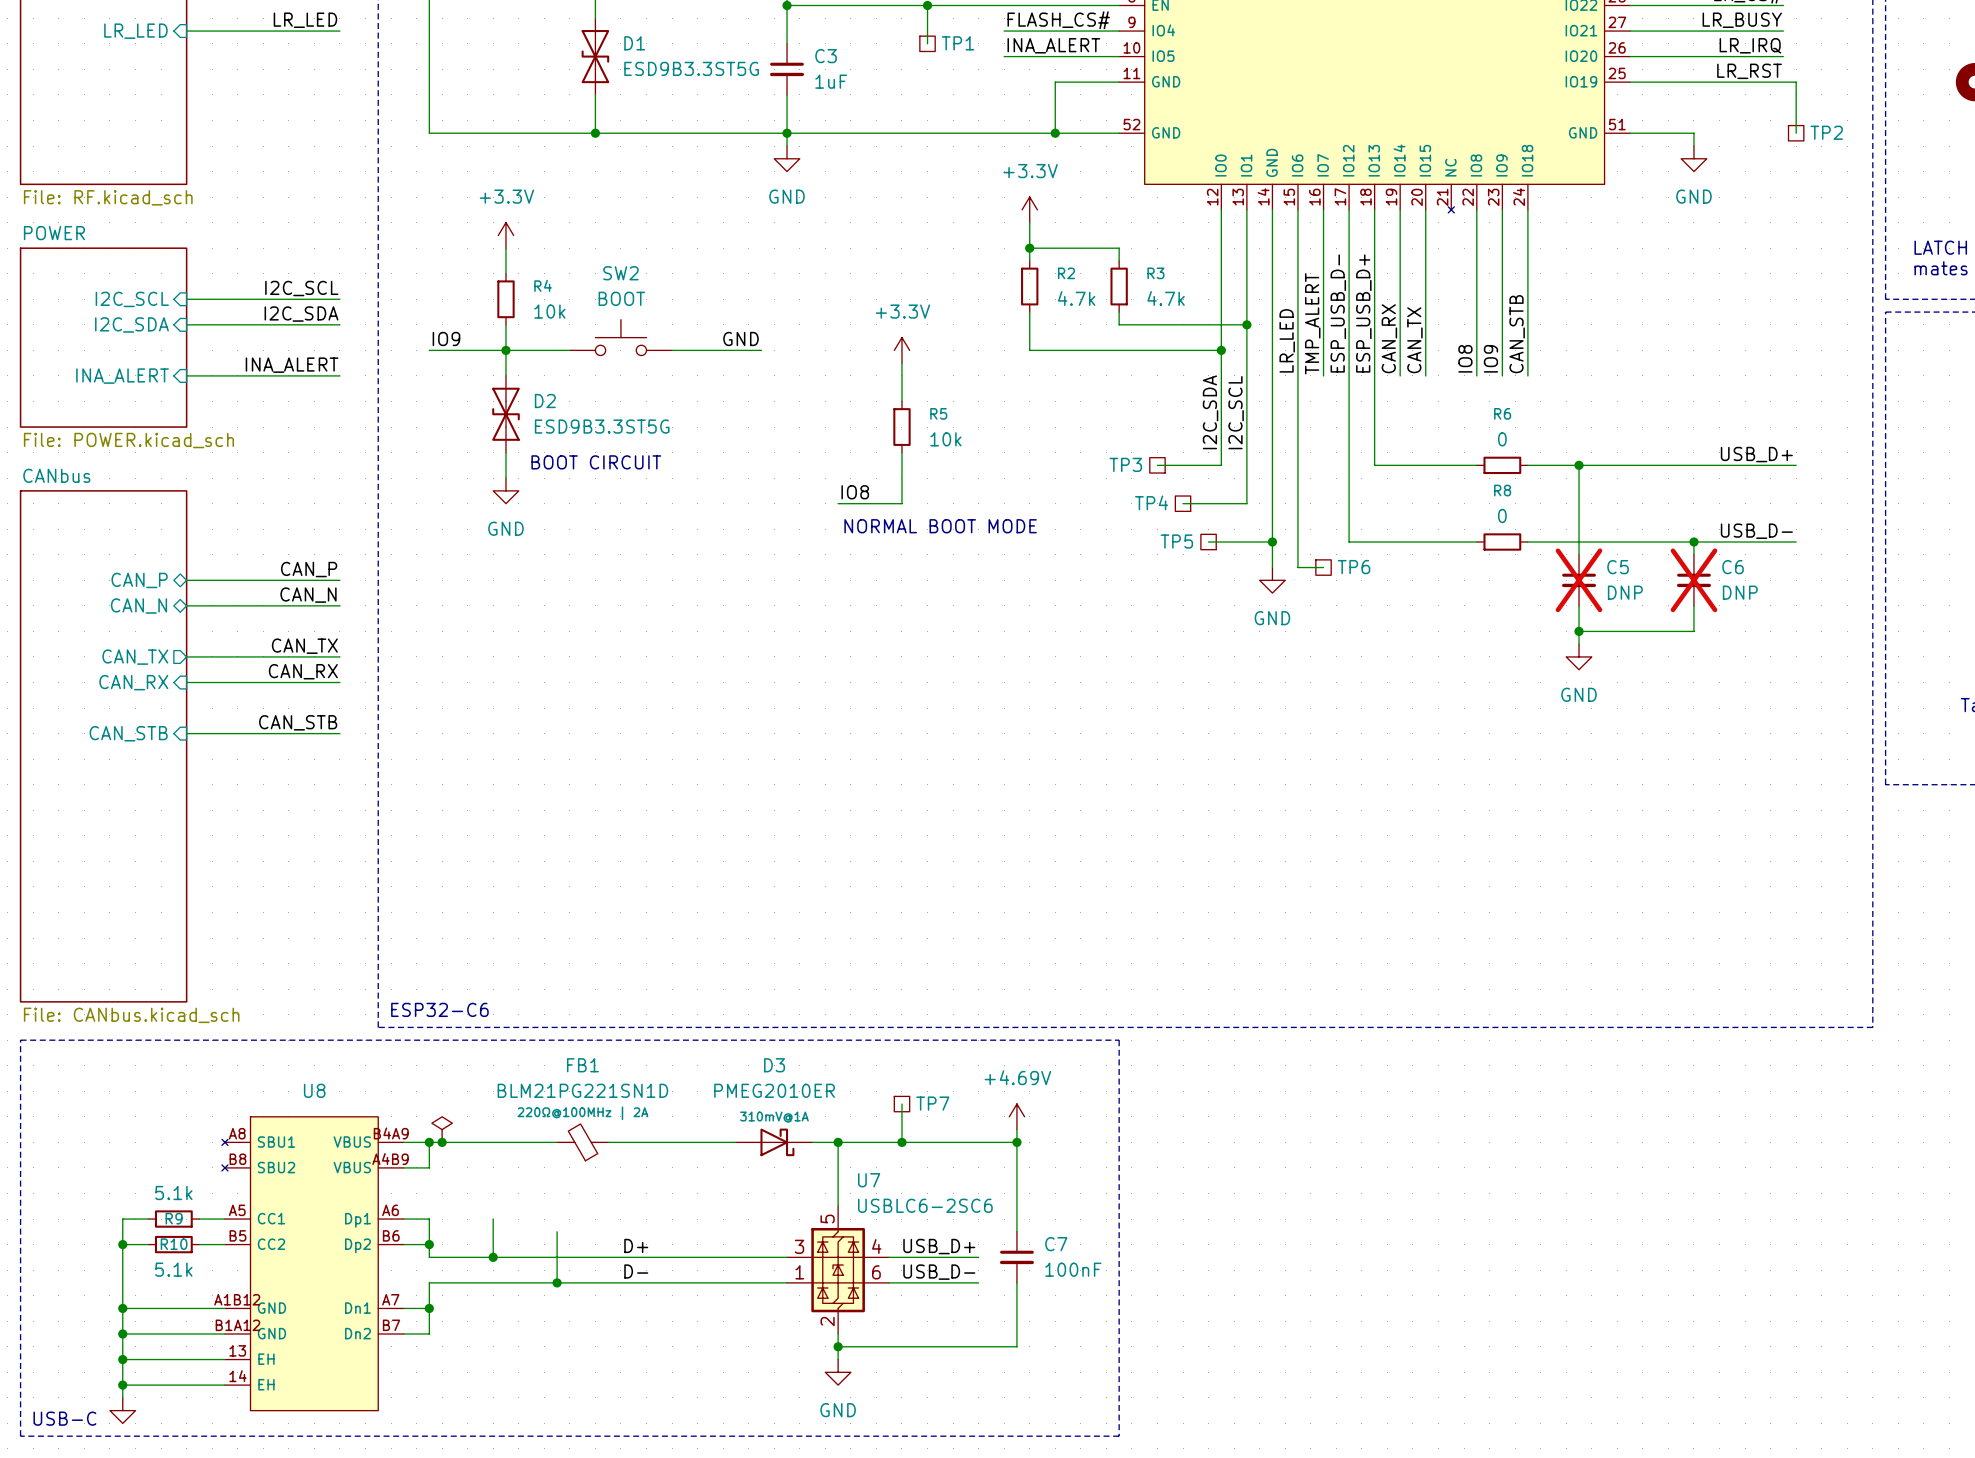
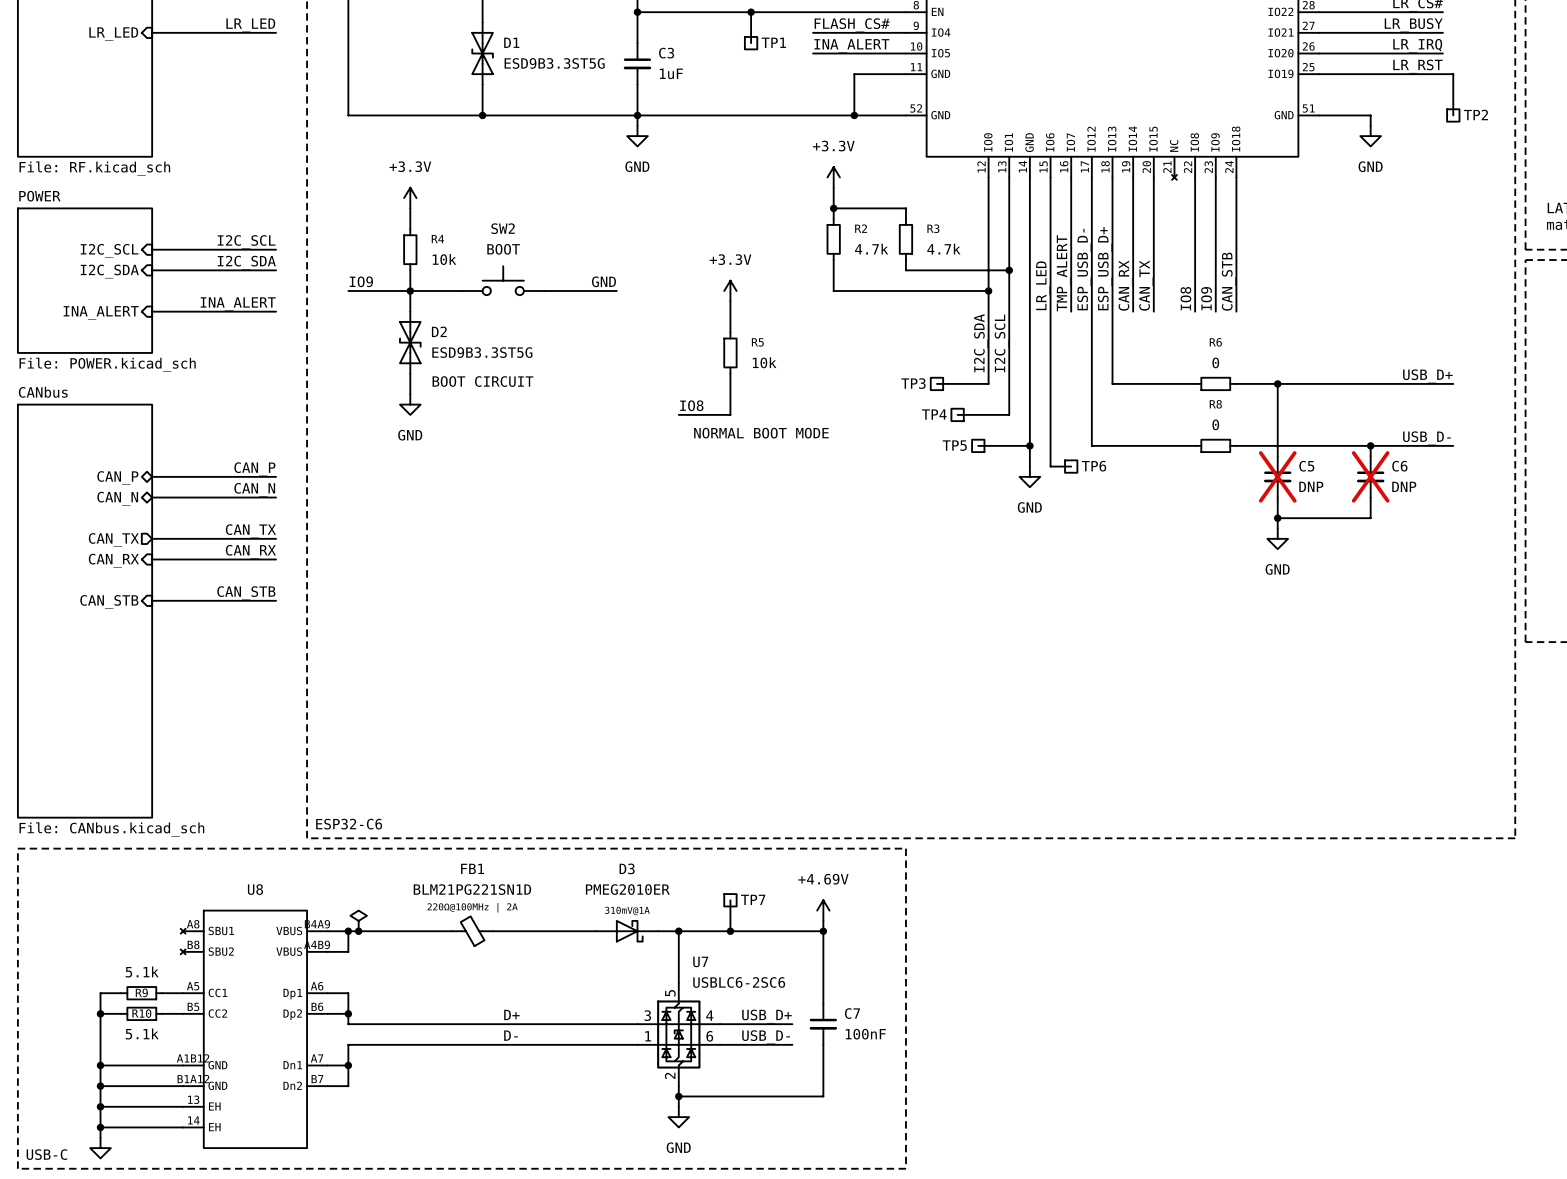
wire: (493, 1219) (493, 1257) -> none
wire: (557, 1231) (557, 1282) -> none
junction: (493, 1257) -> none
junction: (557, 1282) -> none

